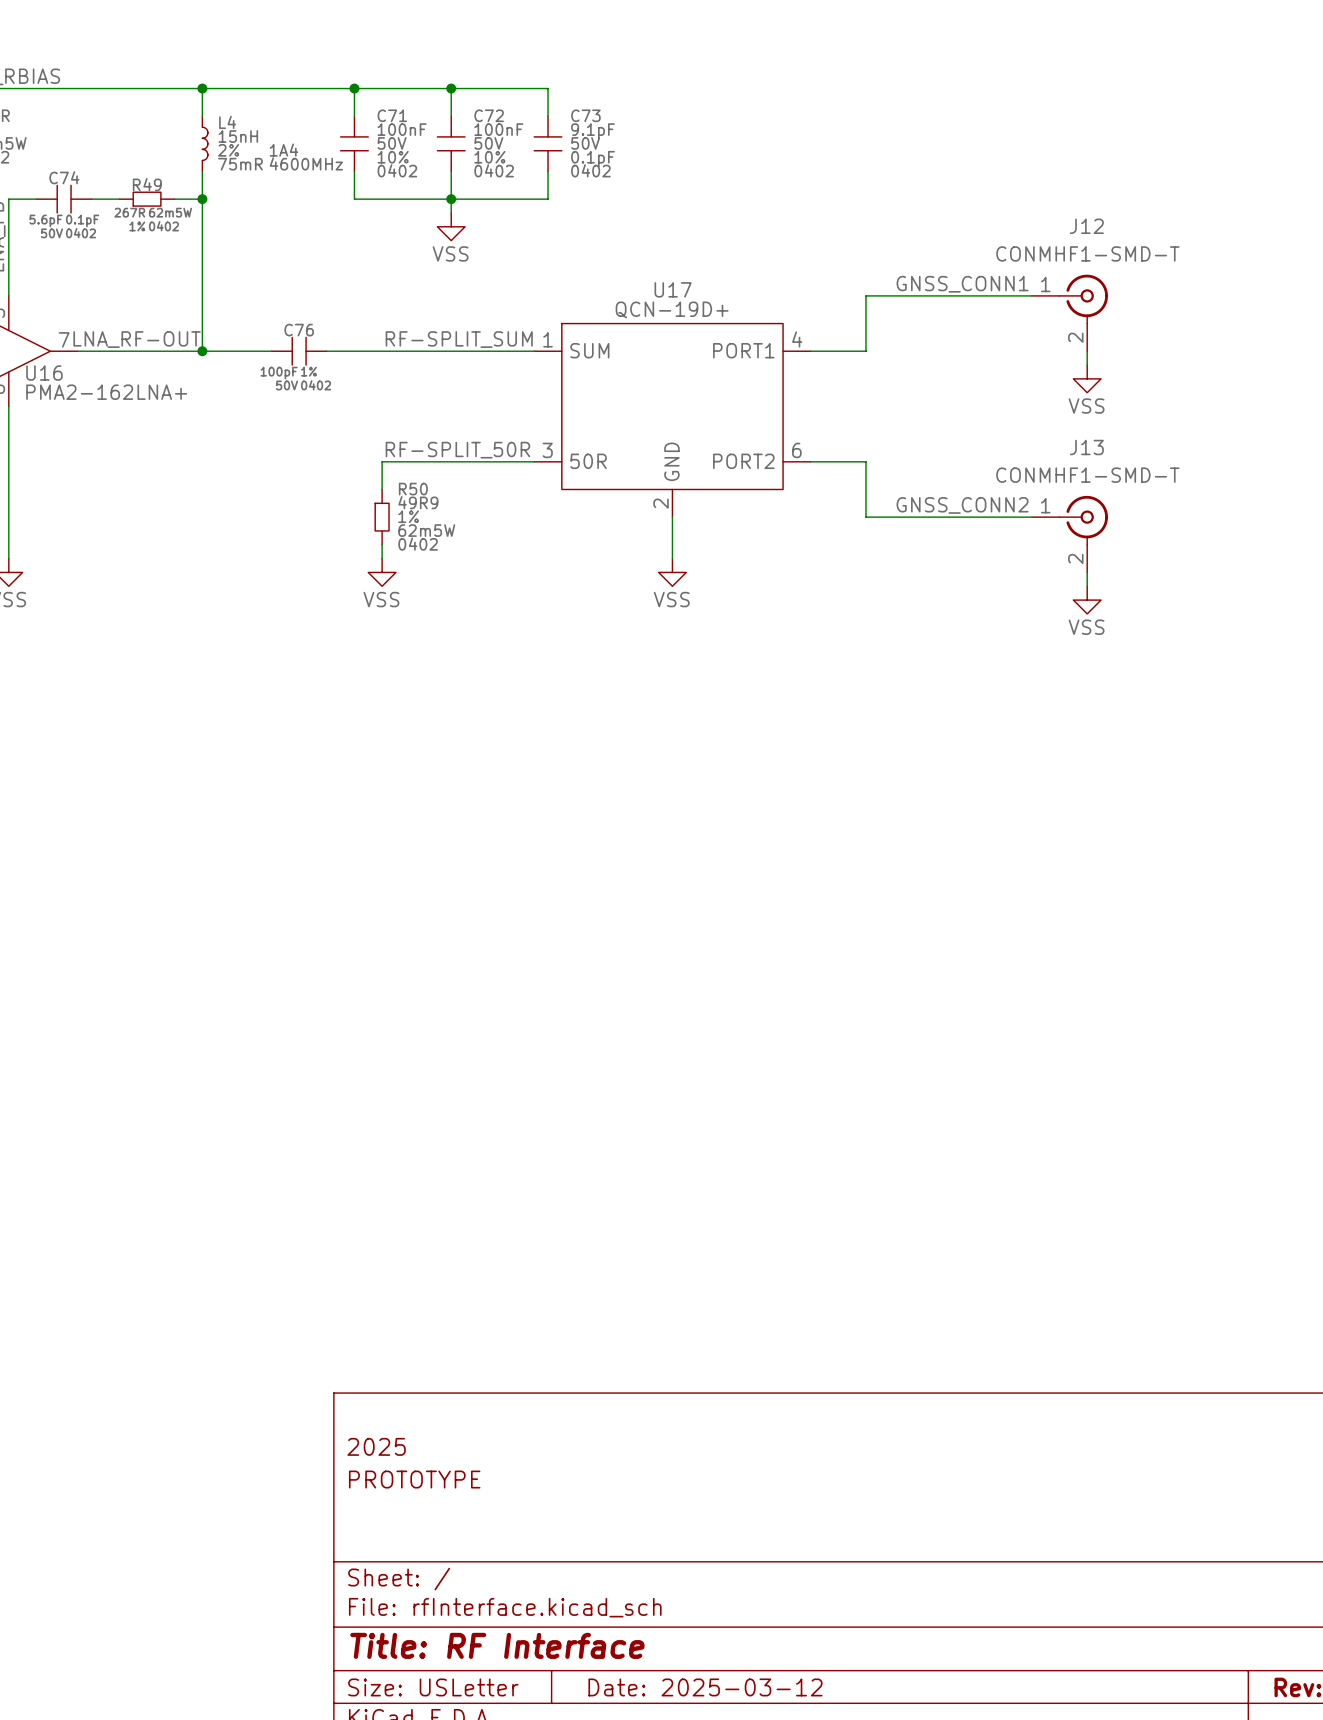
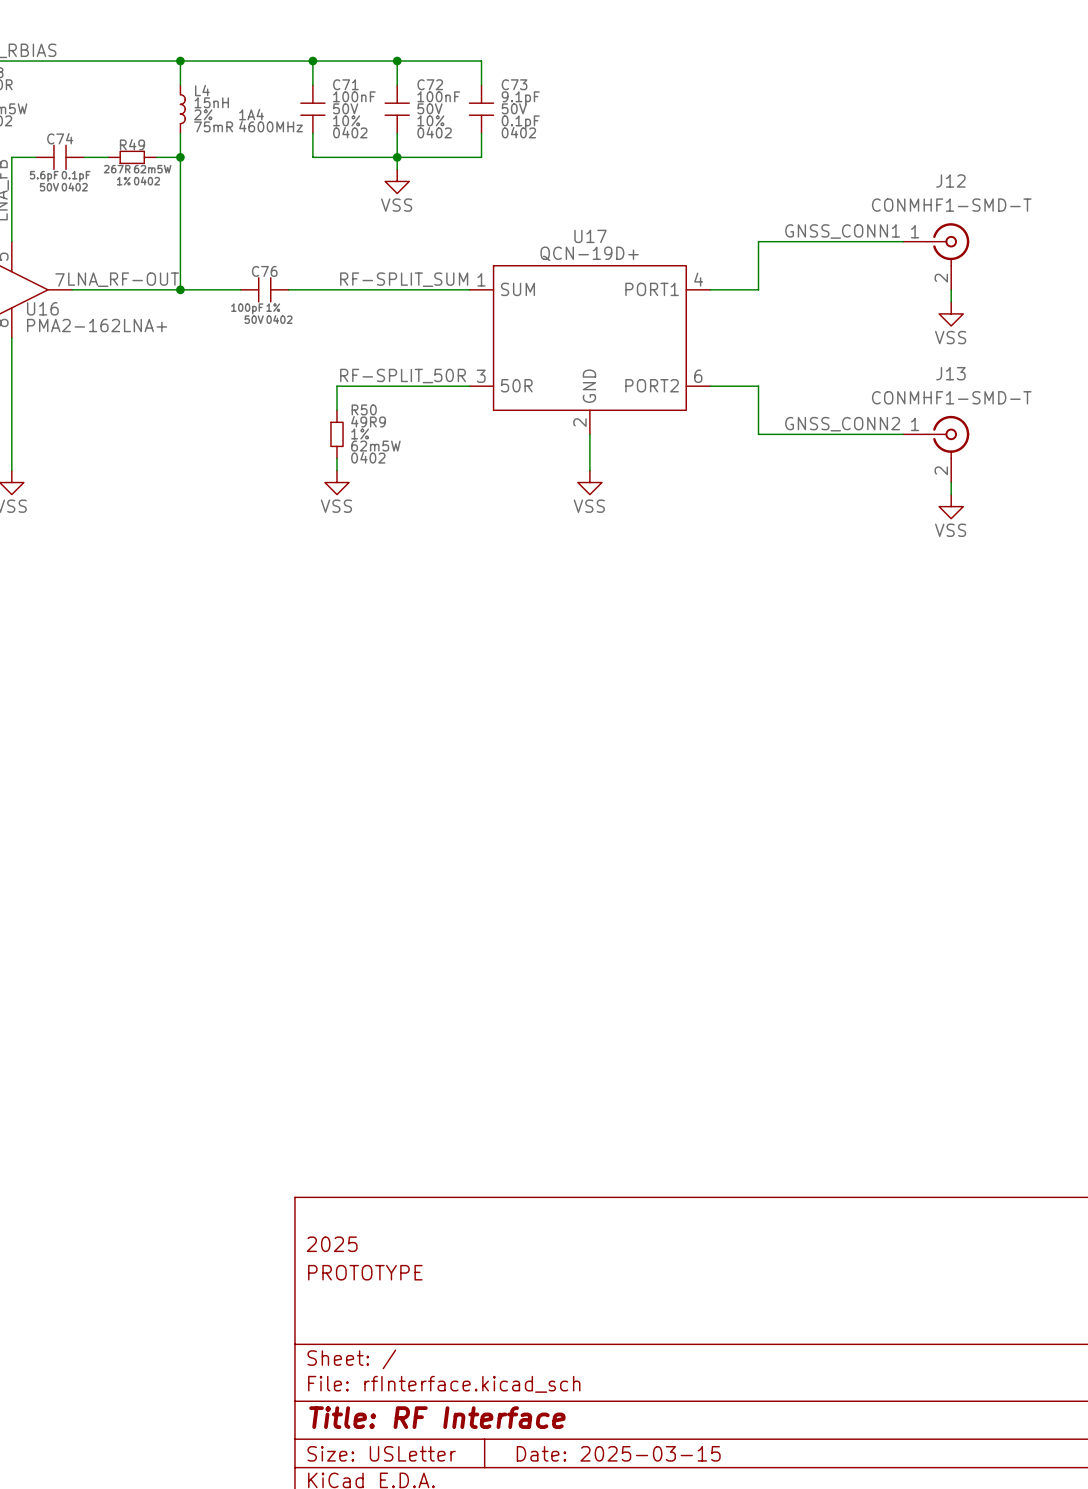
title block: Date: 2025-03-12 (705, 1687) -> Date: 2025-03-15 (618, 1453)

